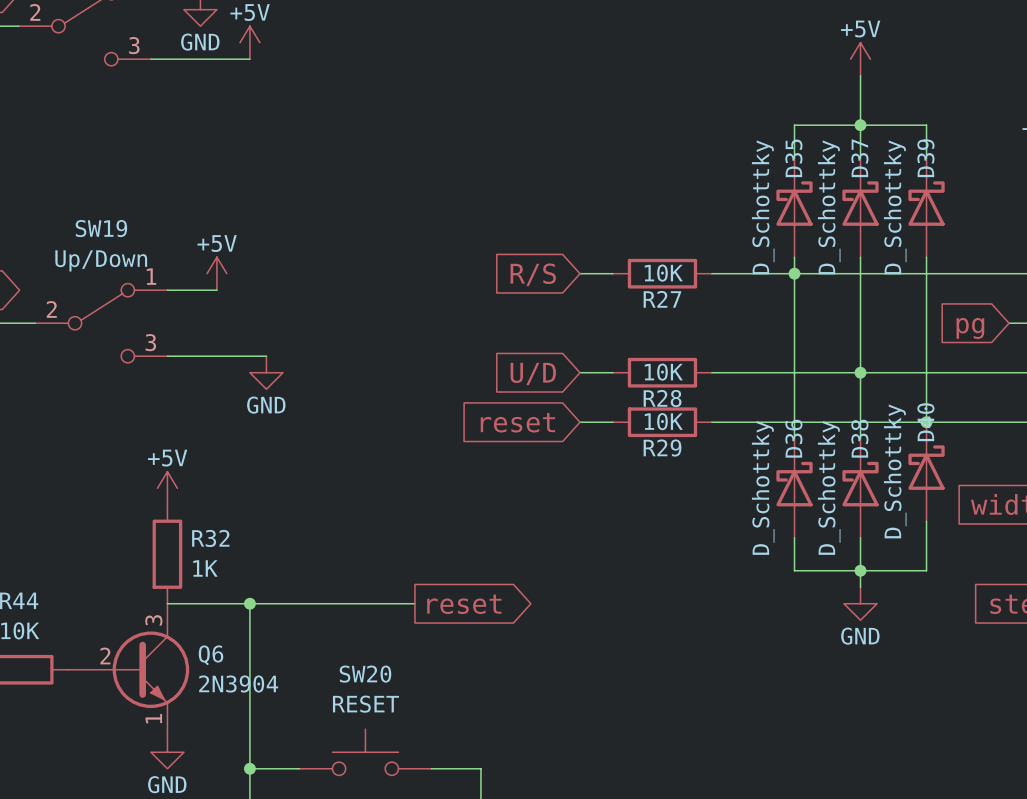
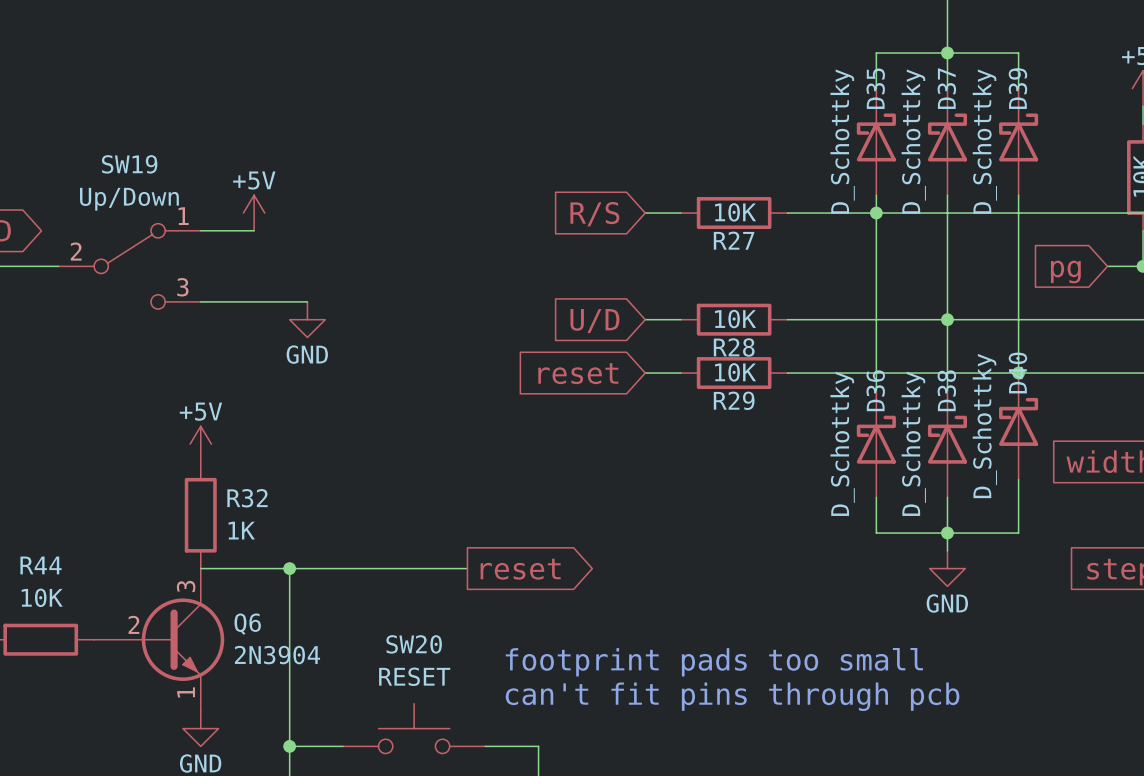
text: none -> footprint pads too small (714, 662)
text: none -> can't fit pins through pcb (732, 696)

